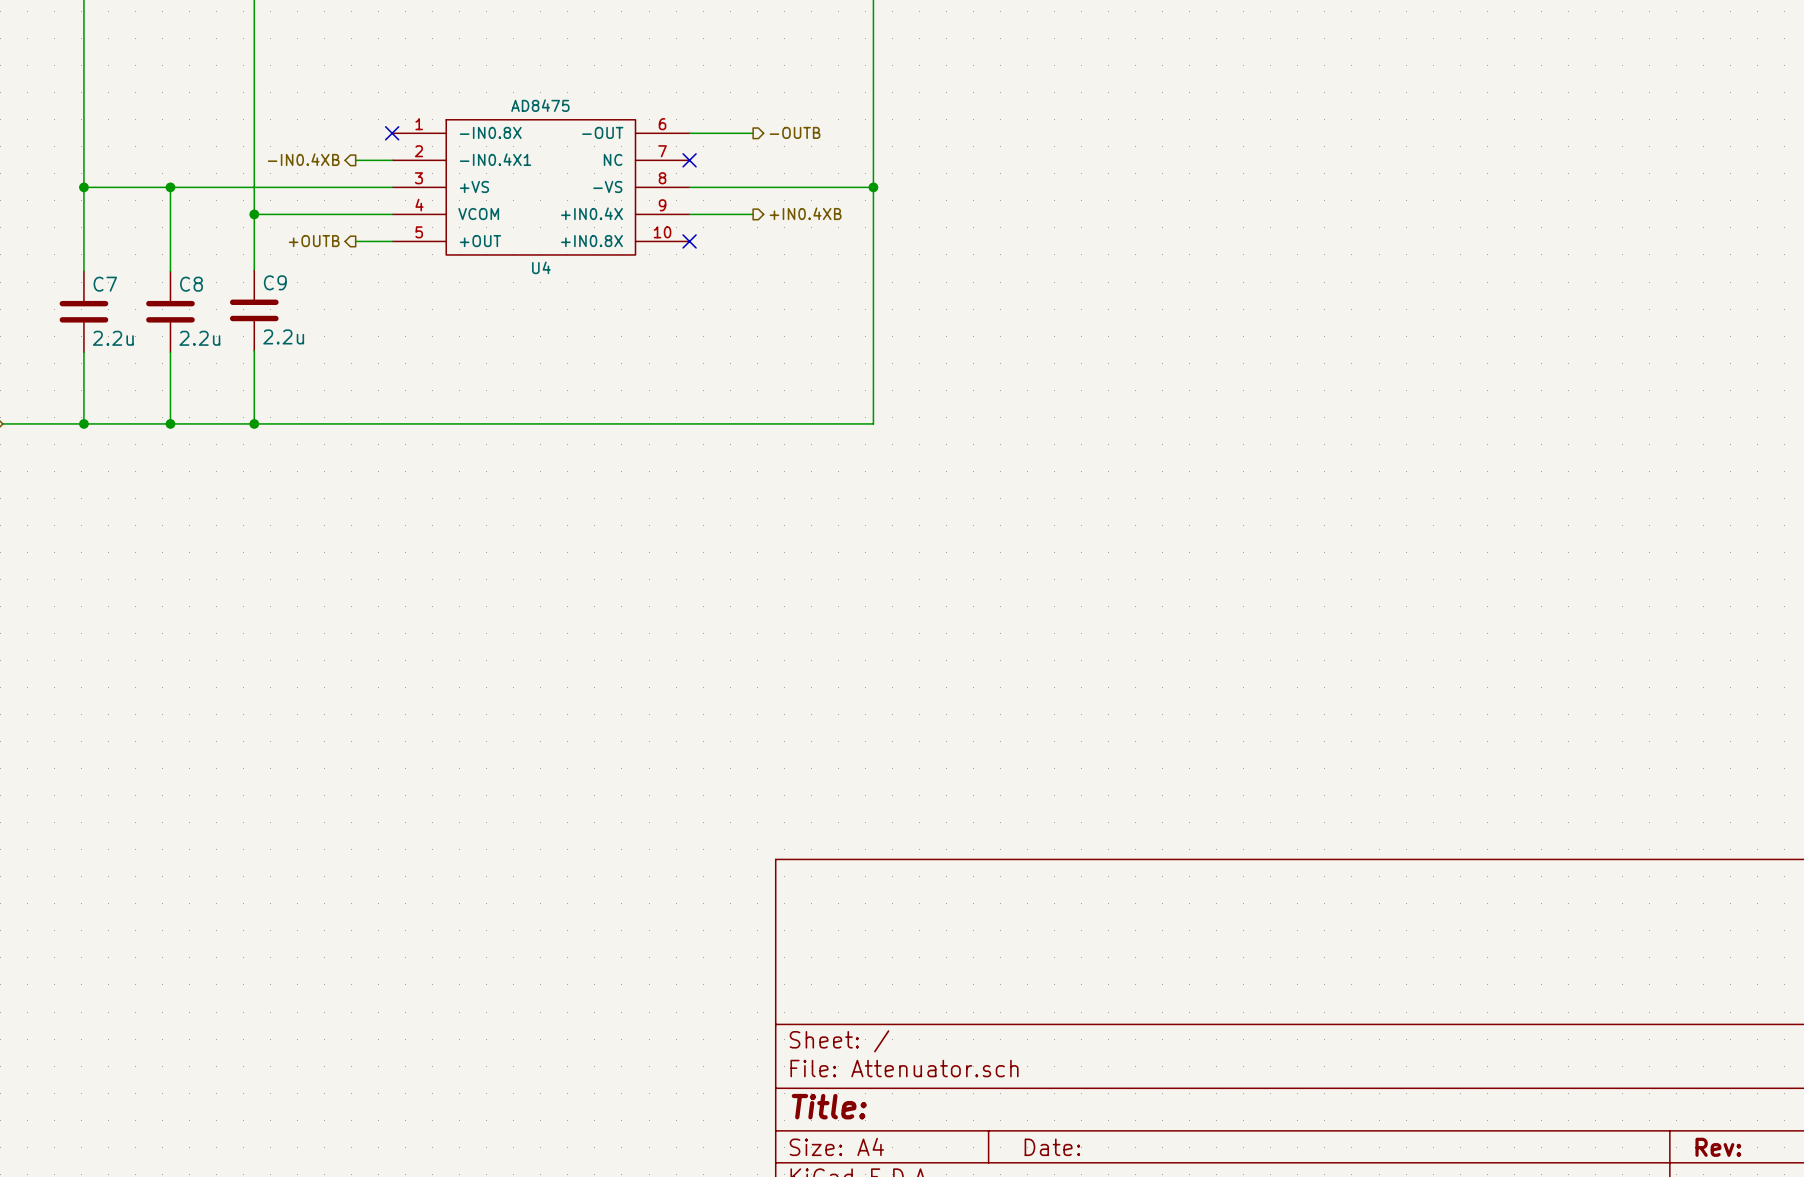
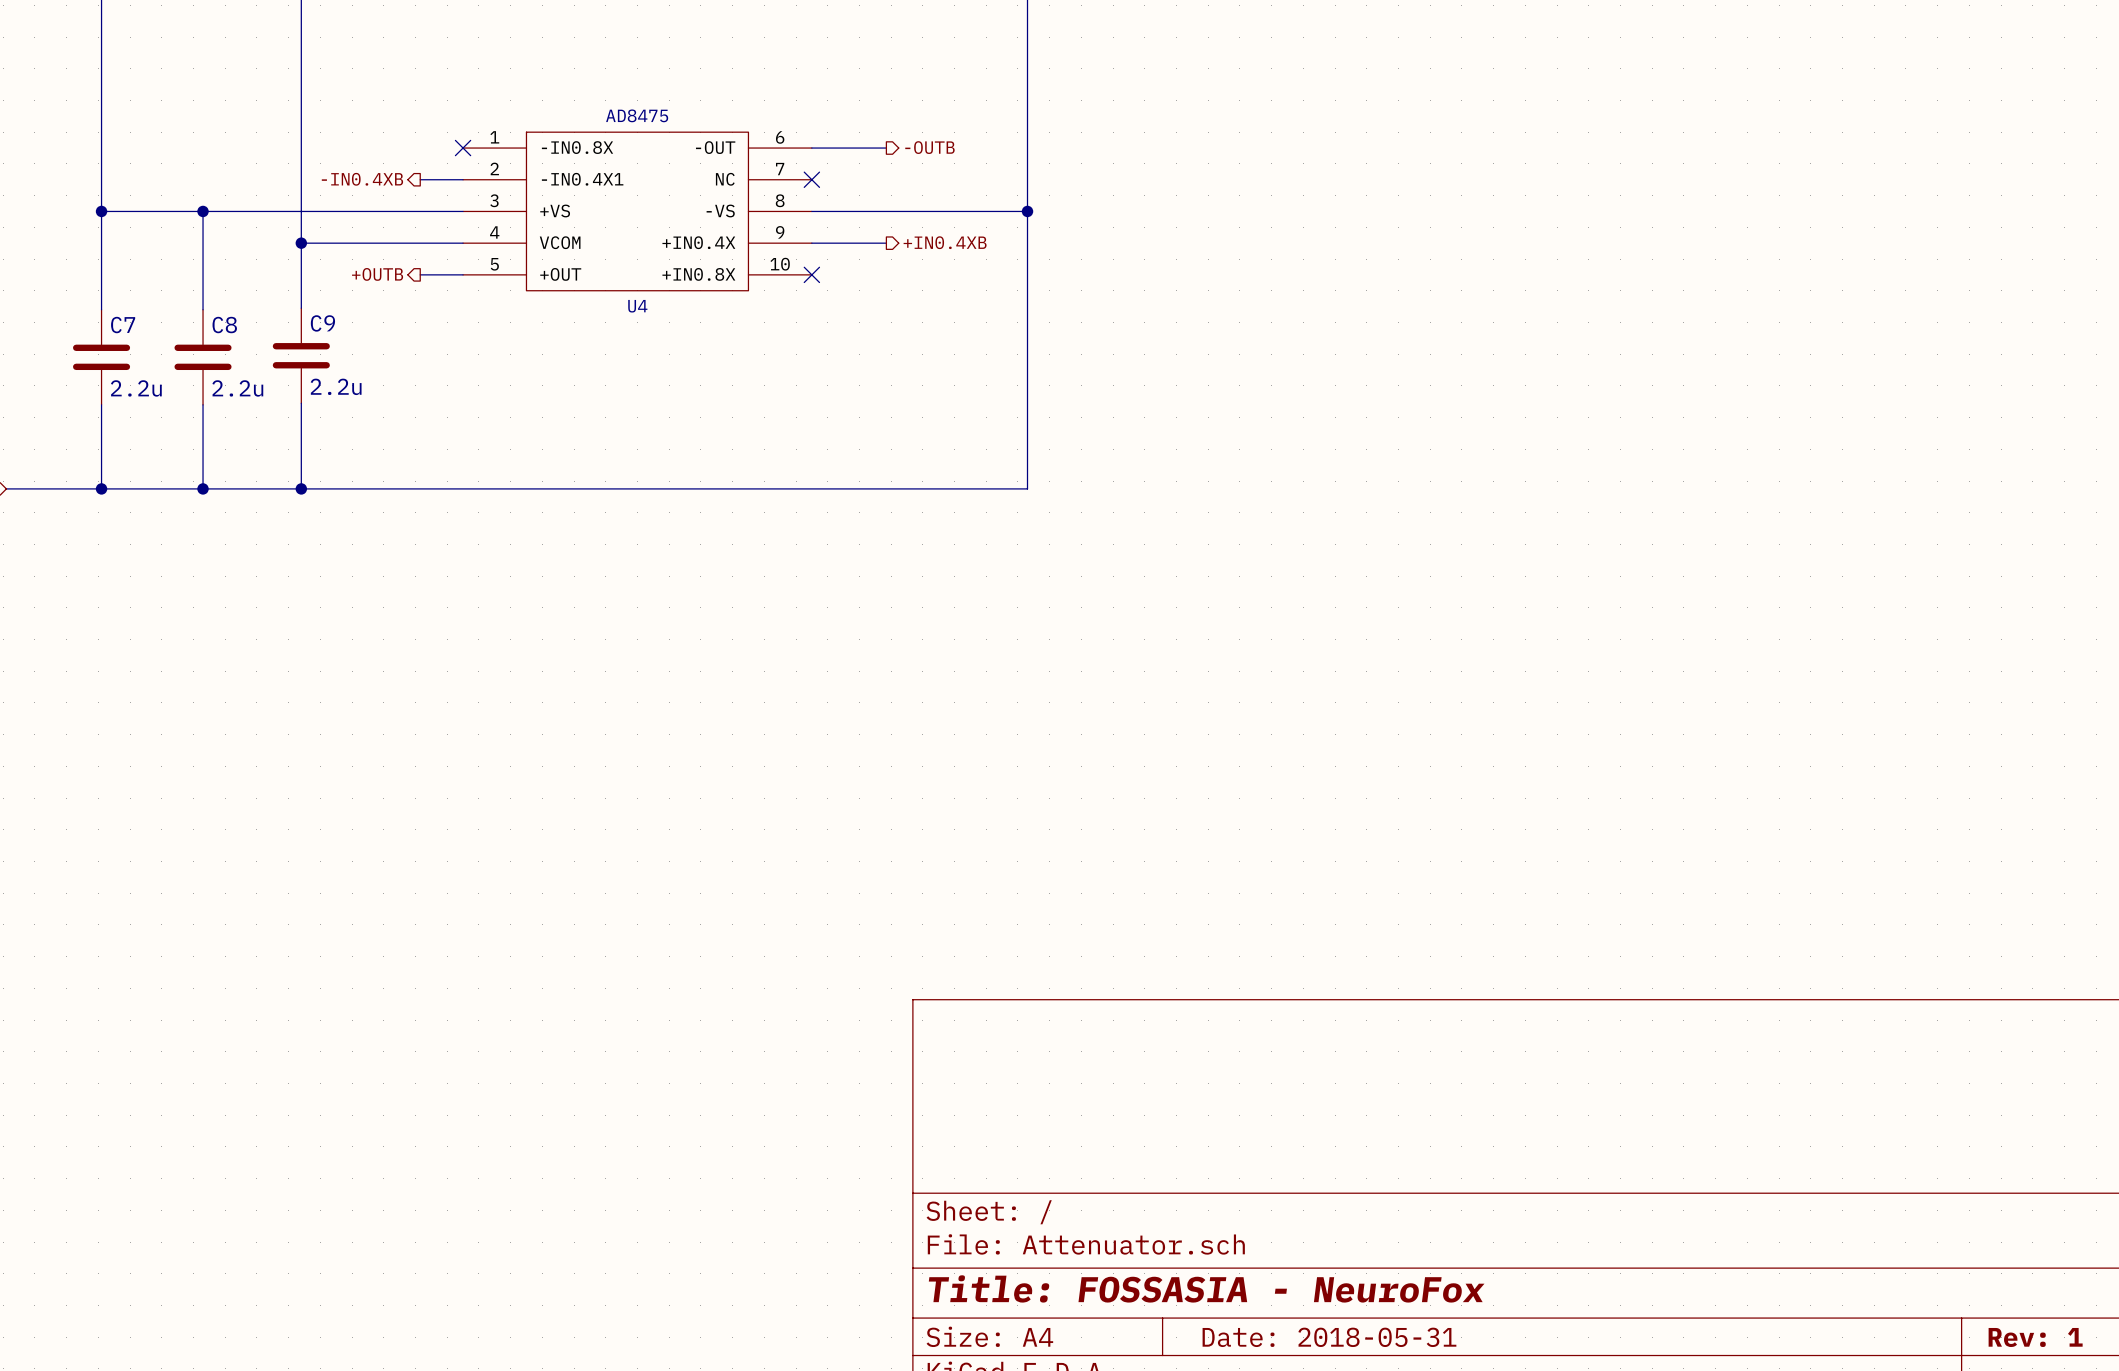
title block: Title: (829, 1106) -> Title: FOSSASIA - NeuroFox (1206, 1288)
title block: Date: (1052, 1147) -> Date: 2018-05-31 (1329, 1337)
title block: Rev: (1718, 1147) -> Rev: 1 (2035, 1337)

